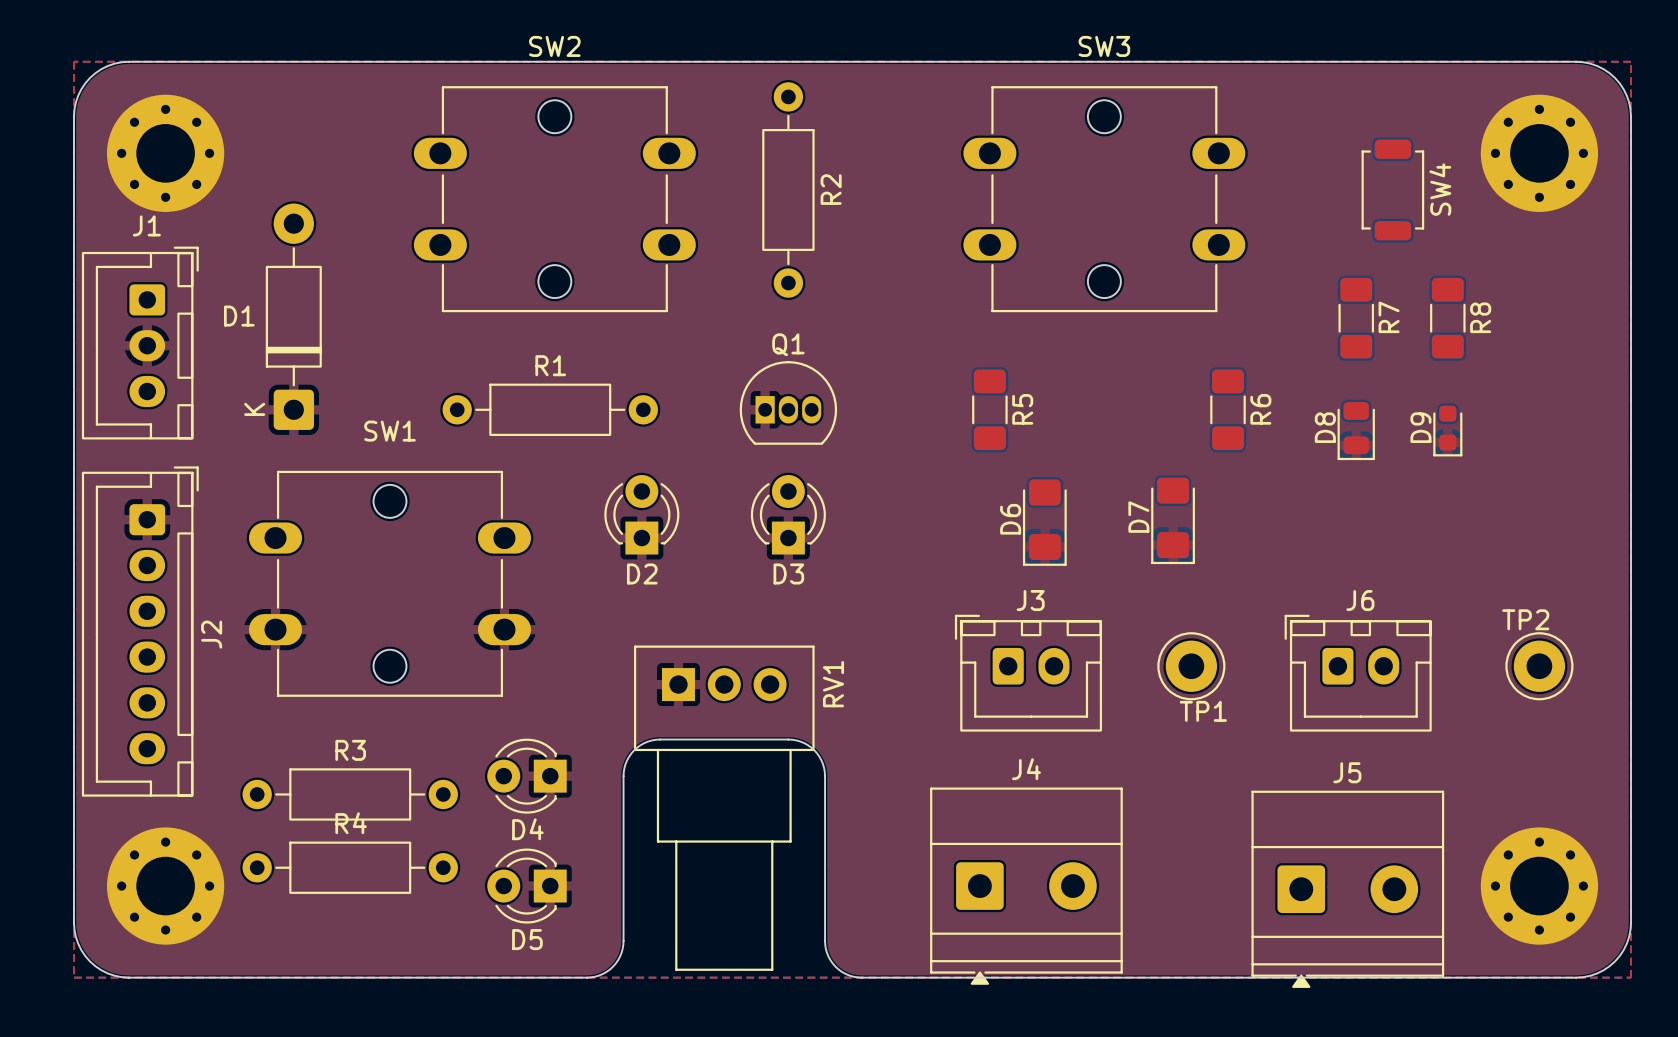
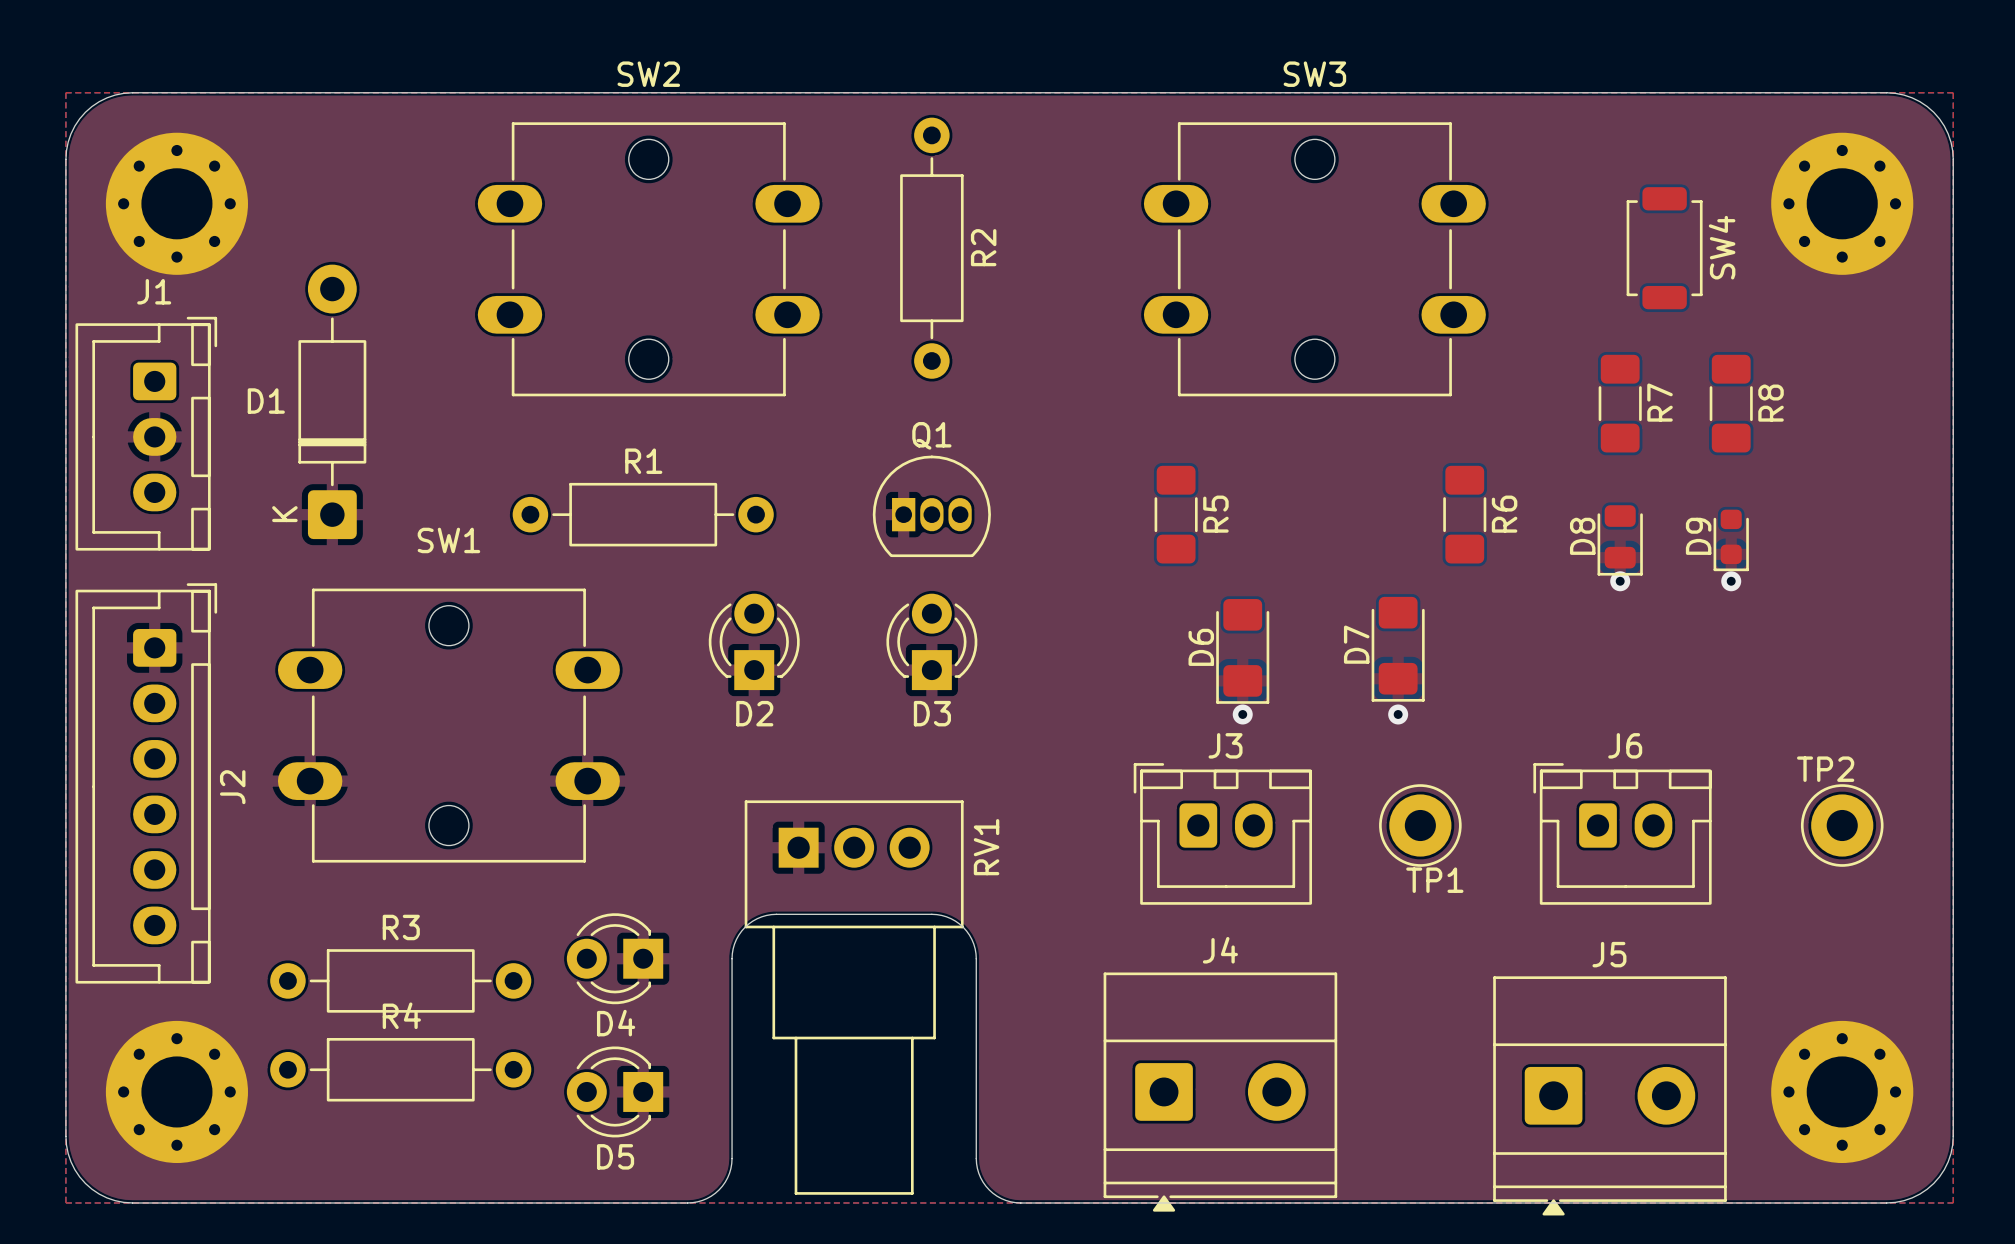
via: none -> (1620, 581)
via: none -> (1731, 581)
via: none -> (1242, 714)
via: none -> (1398, 714)

